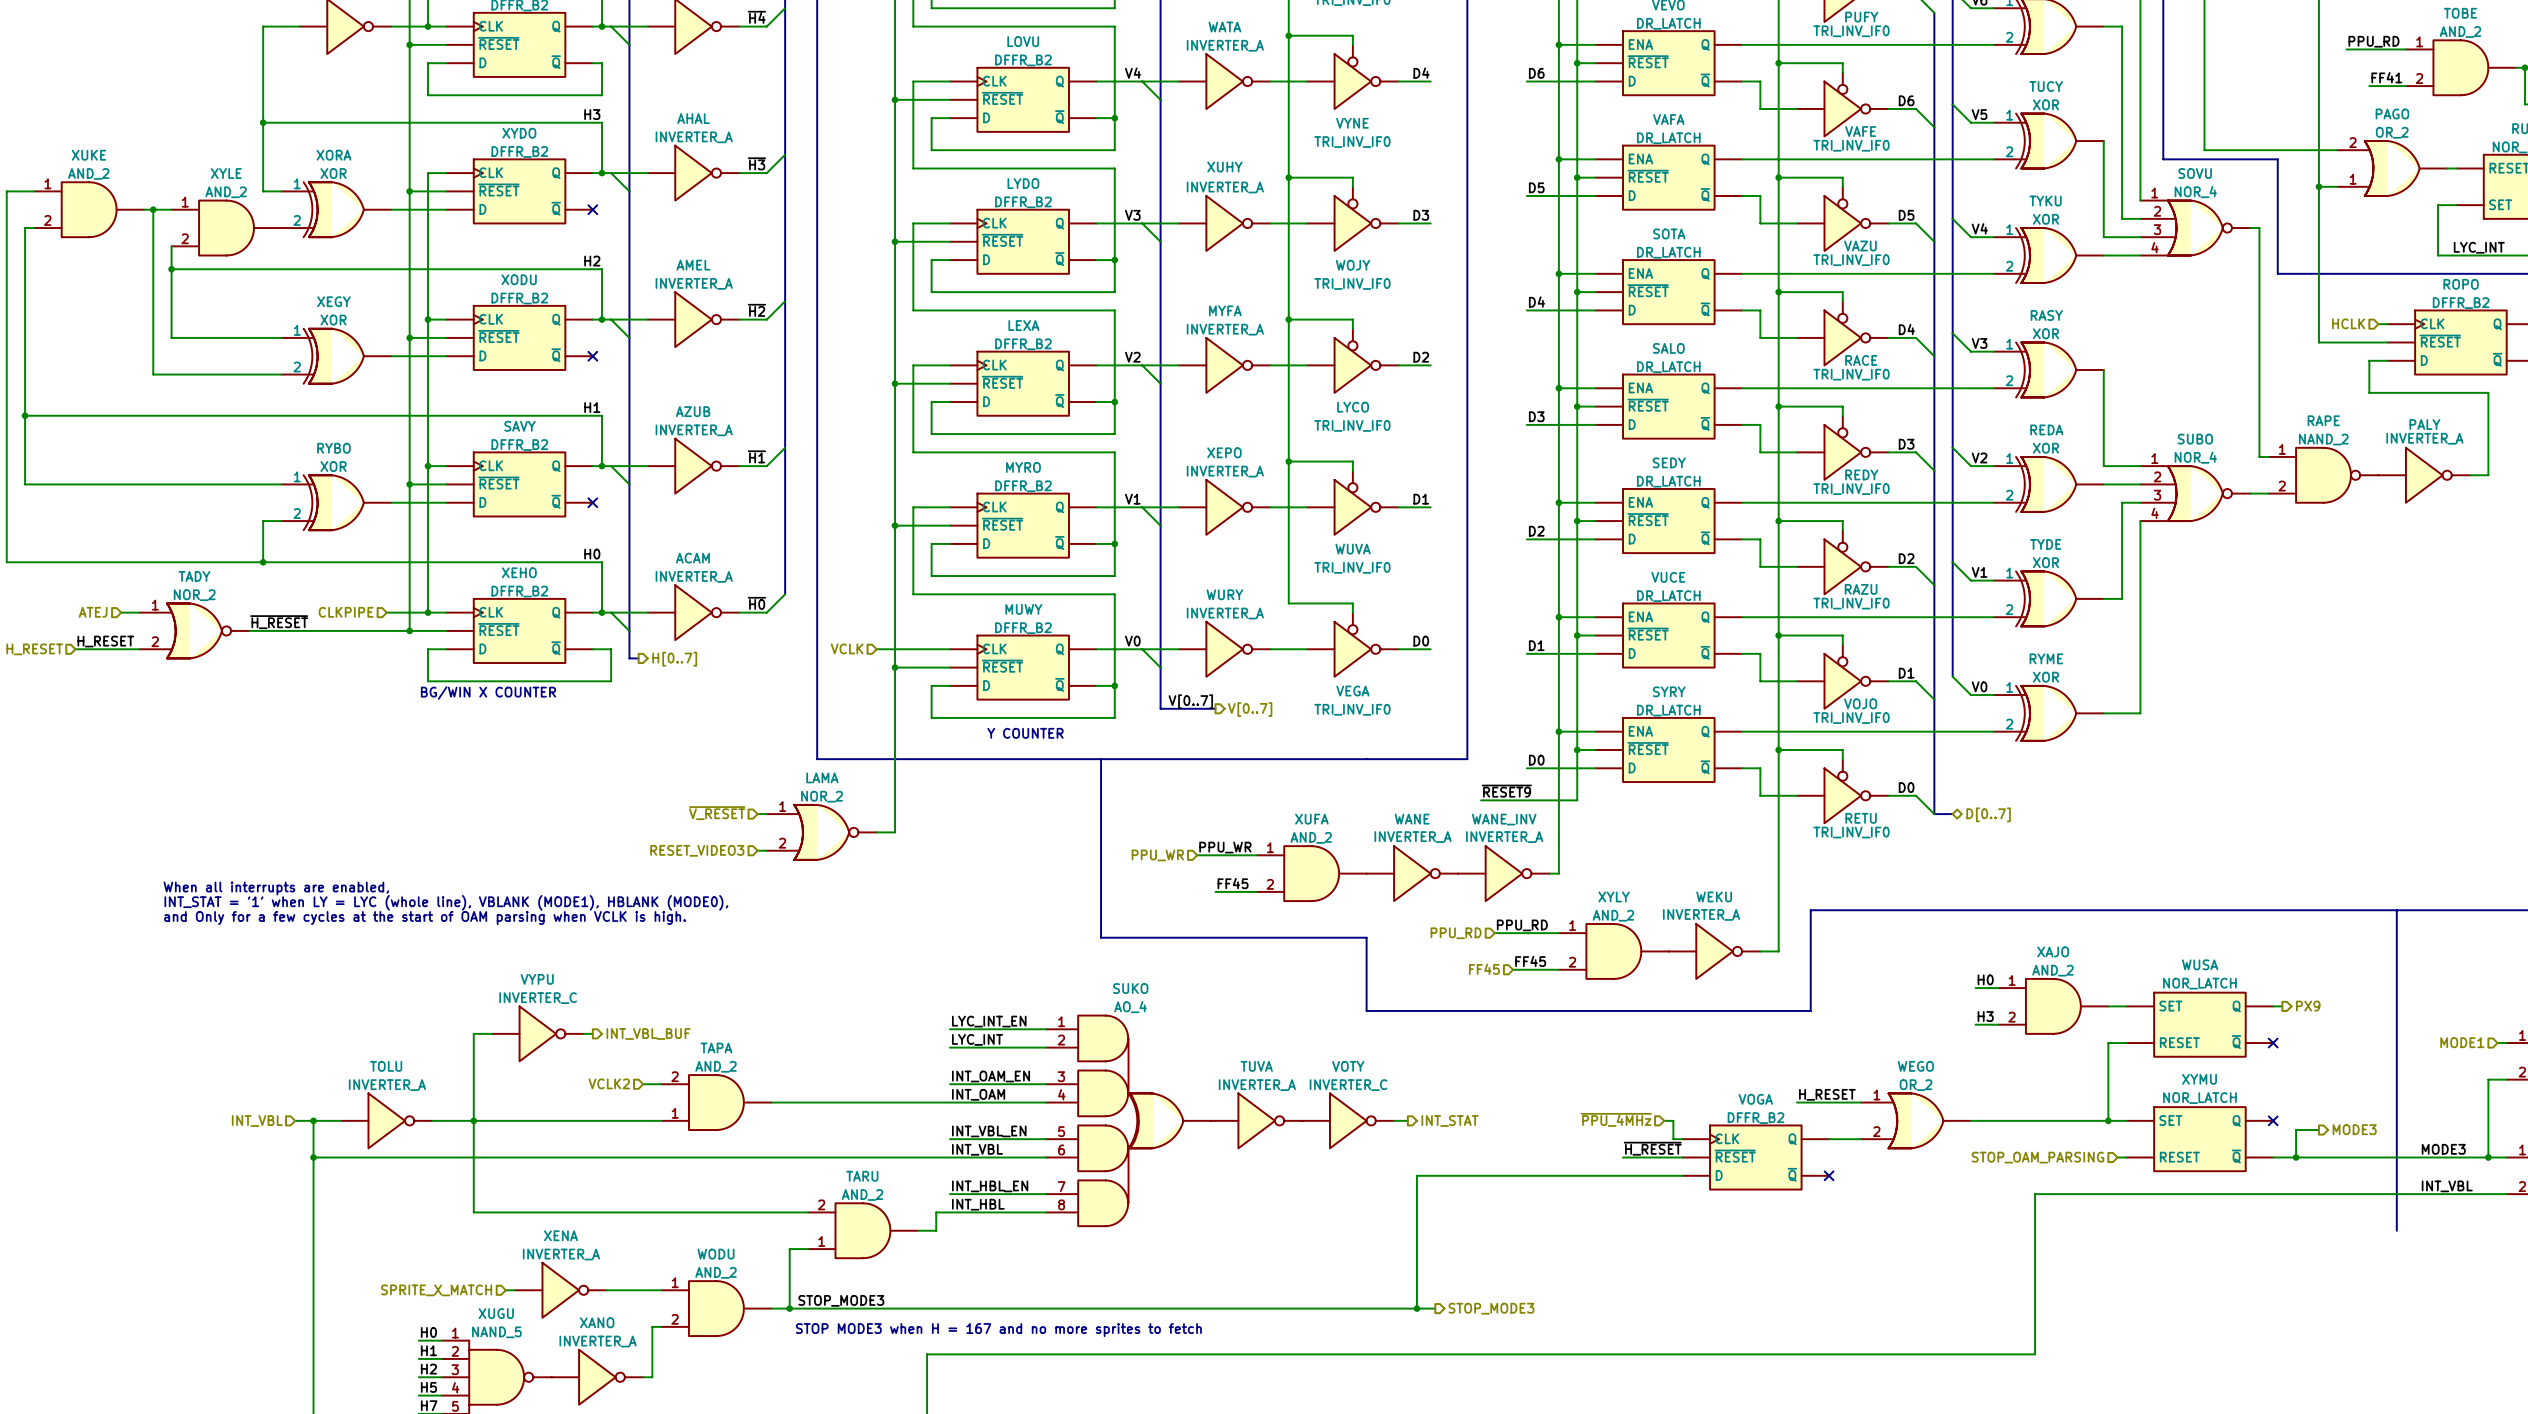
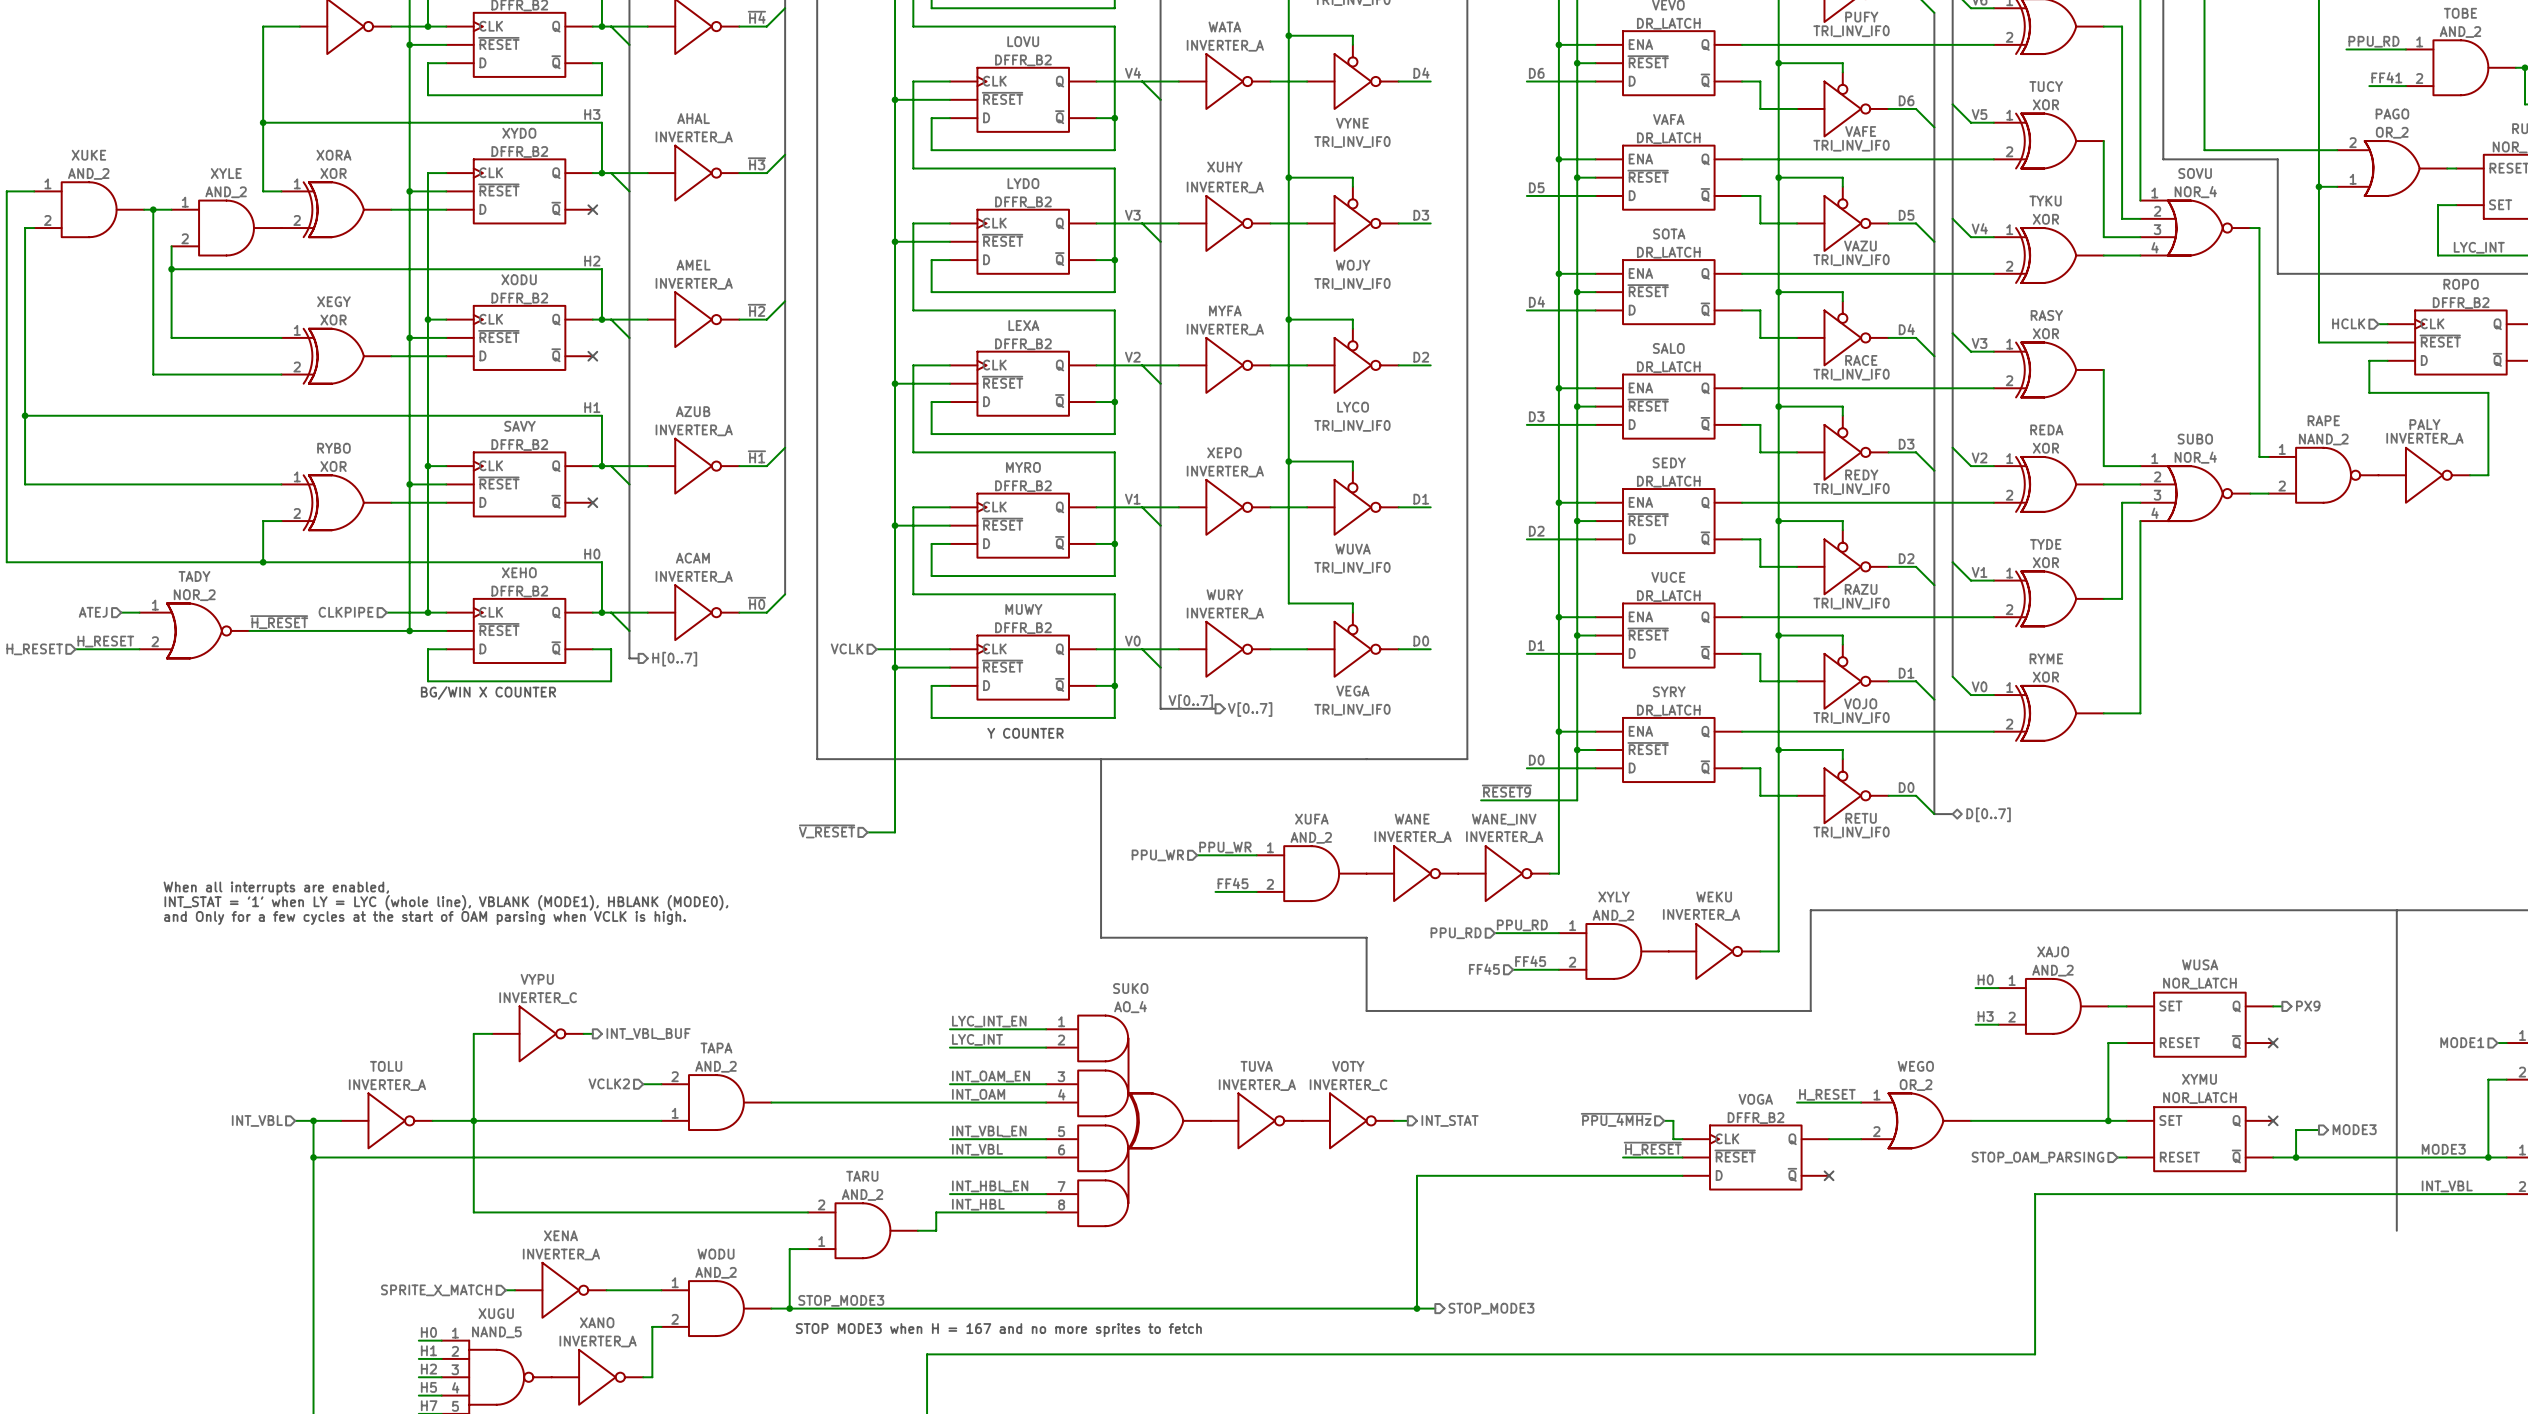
hierarchical label position: ~{V_RESET} (717, 813) -> ~{V_RESET} (827, 831)
wire: (757, 814) (766, 814) -> none
LAMA: NOR_2 (821, 832) -> none
hierarchical label: RESET_VIDEO3 (697, 850) -> none

